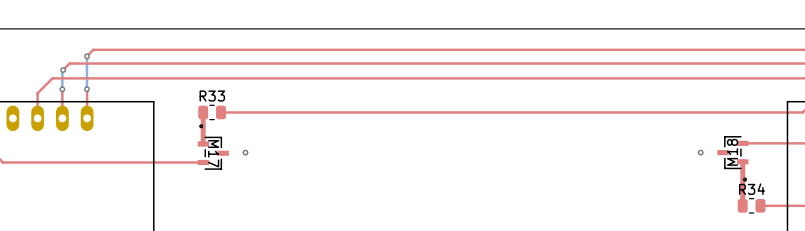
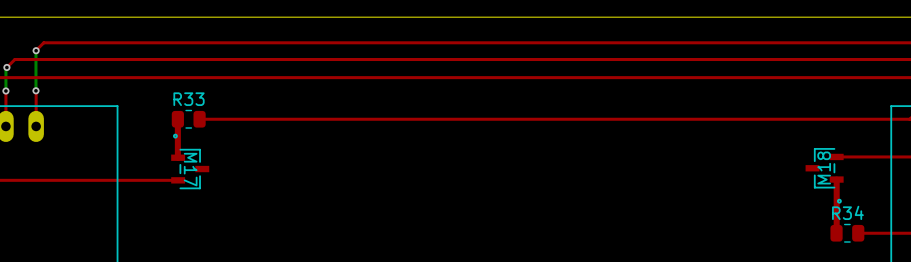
via: (245, 152) -> none
via: (700, 152) -> none

